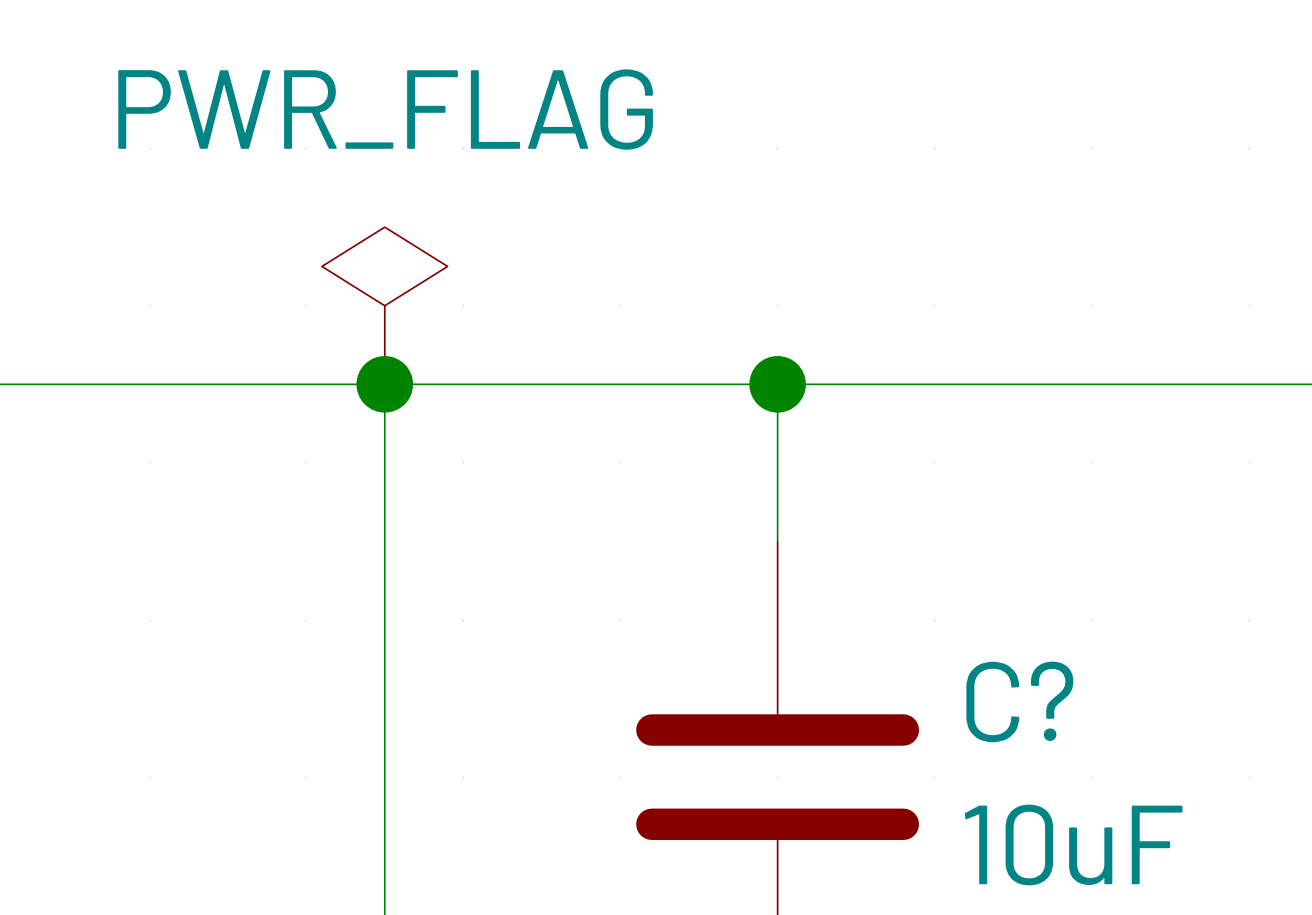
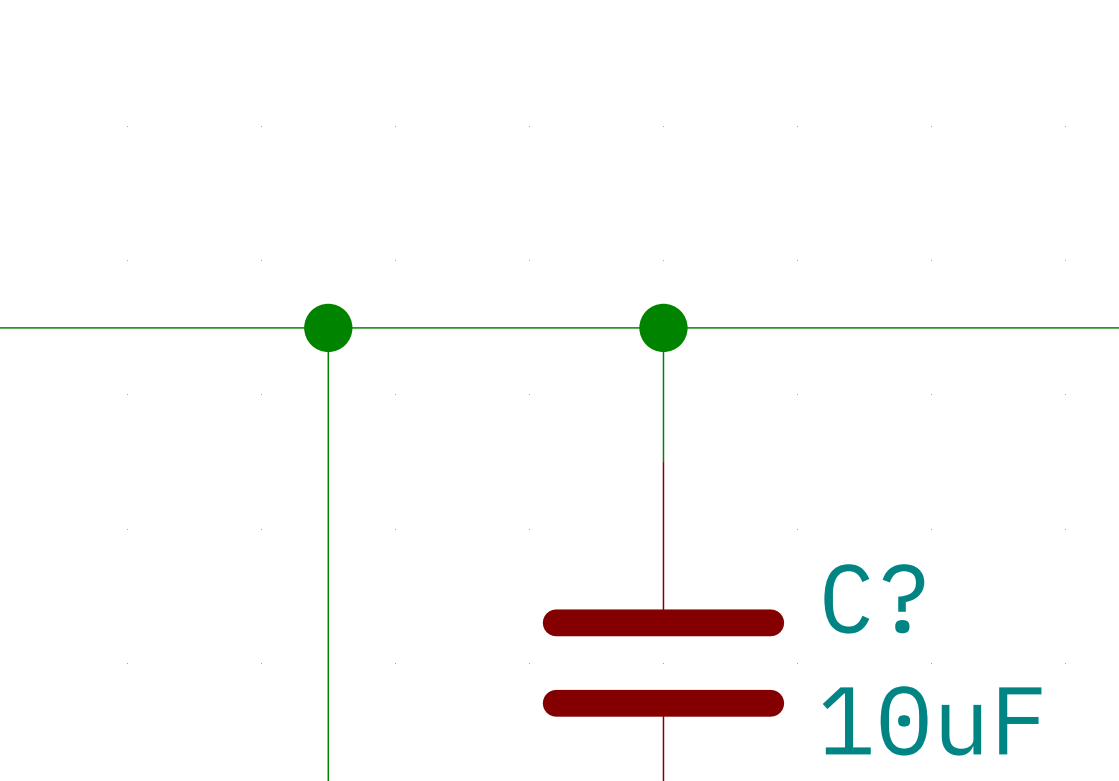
power symbol: PWR_FLAG (384, 305) -> none

